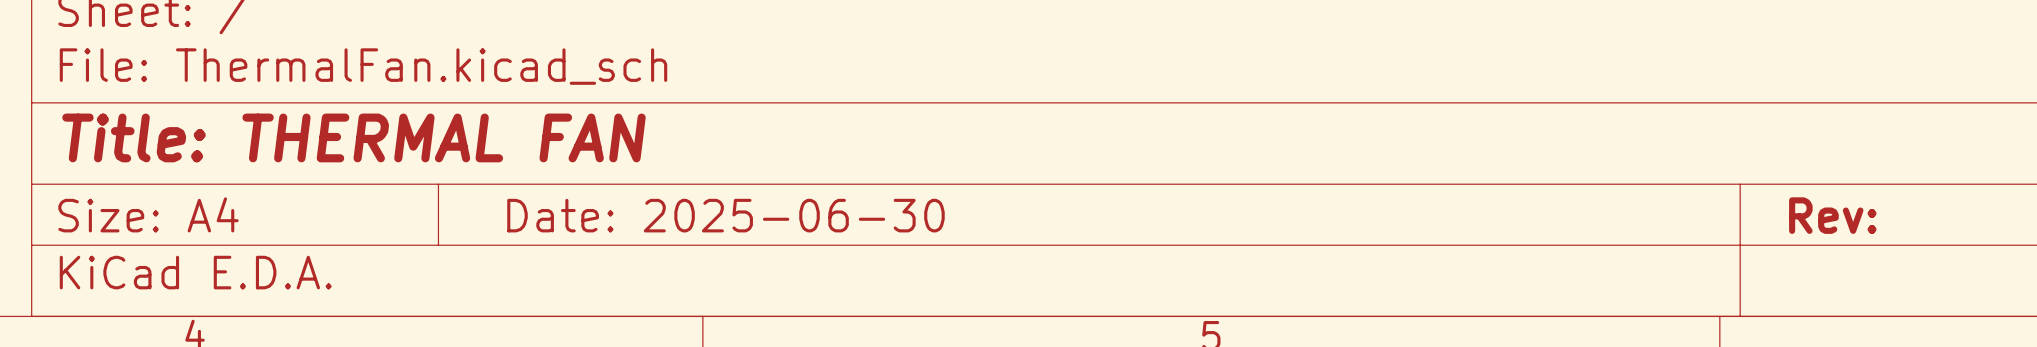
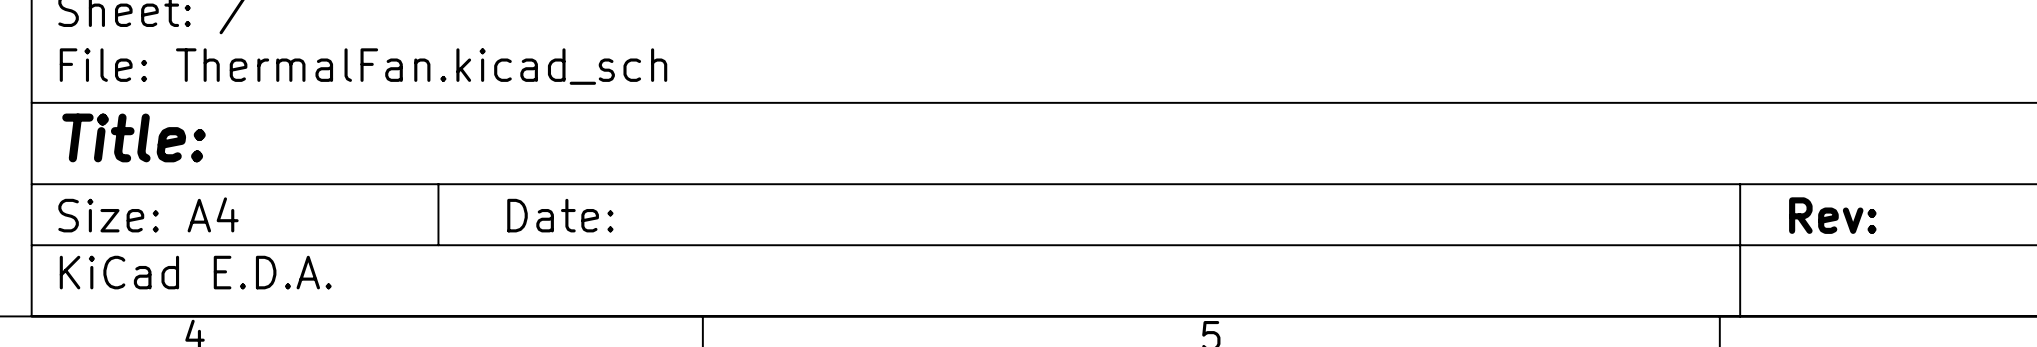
title block: Title: THERMAL FAN (353, 137) -> Title: (134, 137)
title block: Date: 2025-06-30 (725, 215) -> Date: (560, 215)

